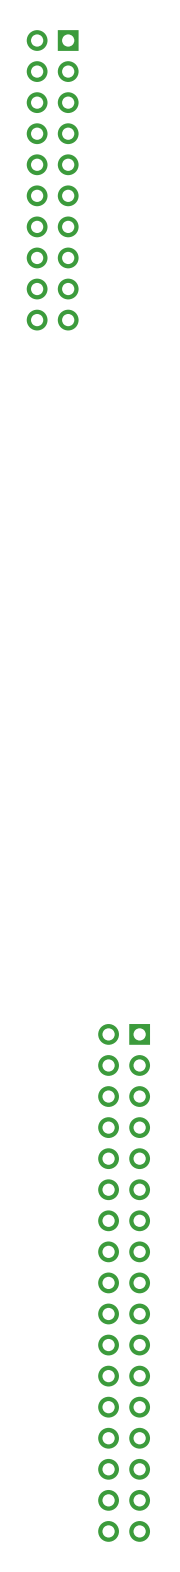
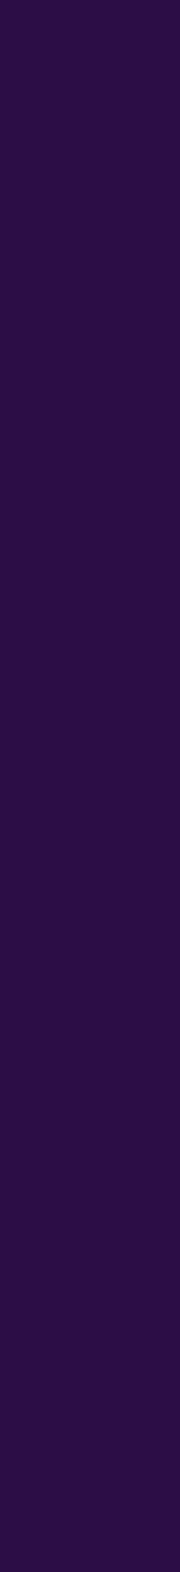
part: (52, 180) -> none
part: (124, 1282) -> none

